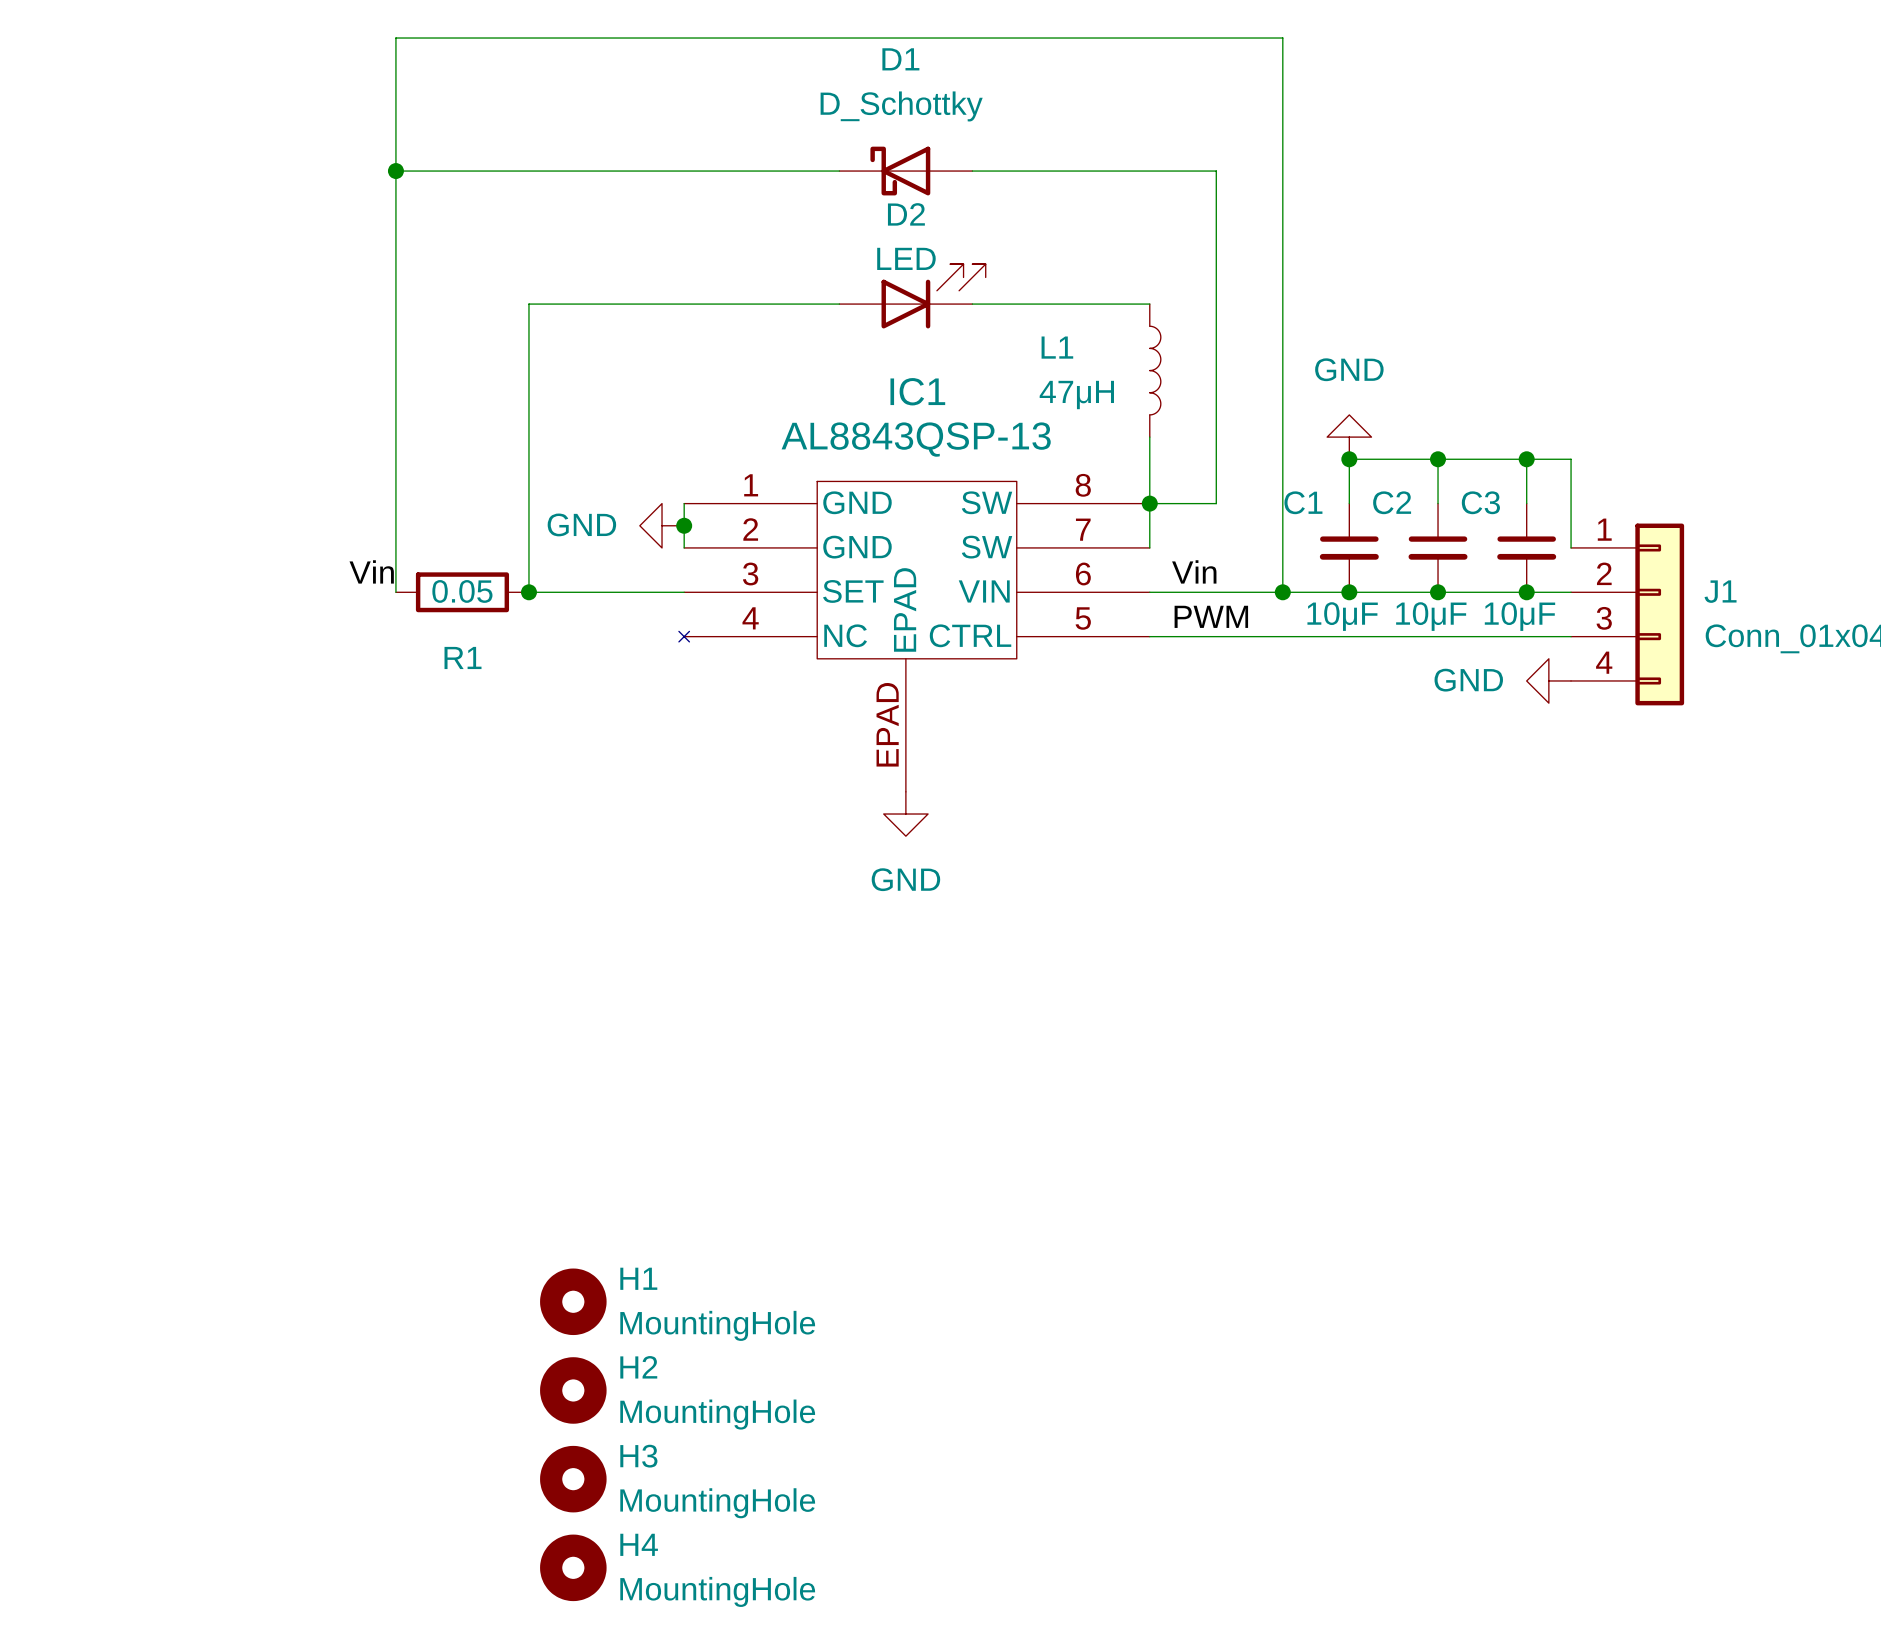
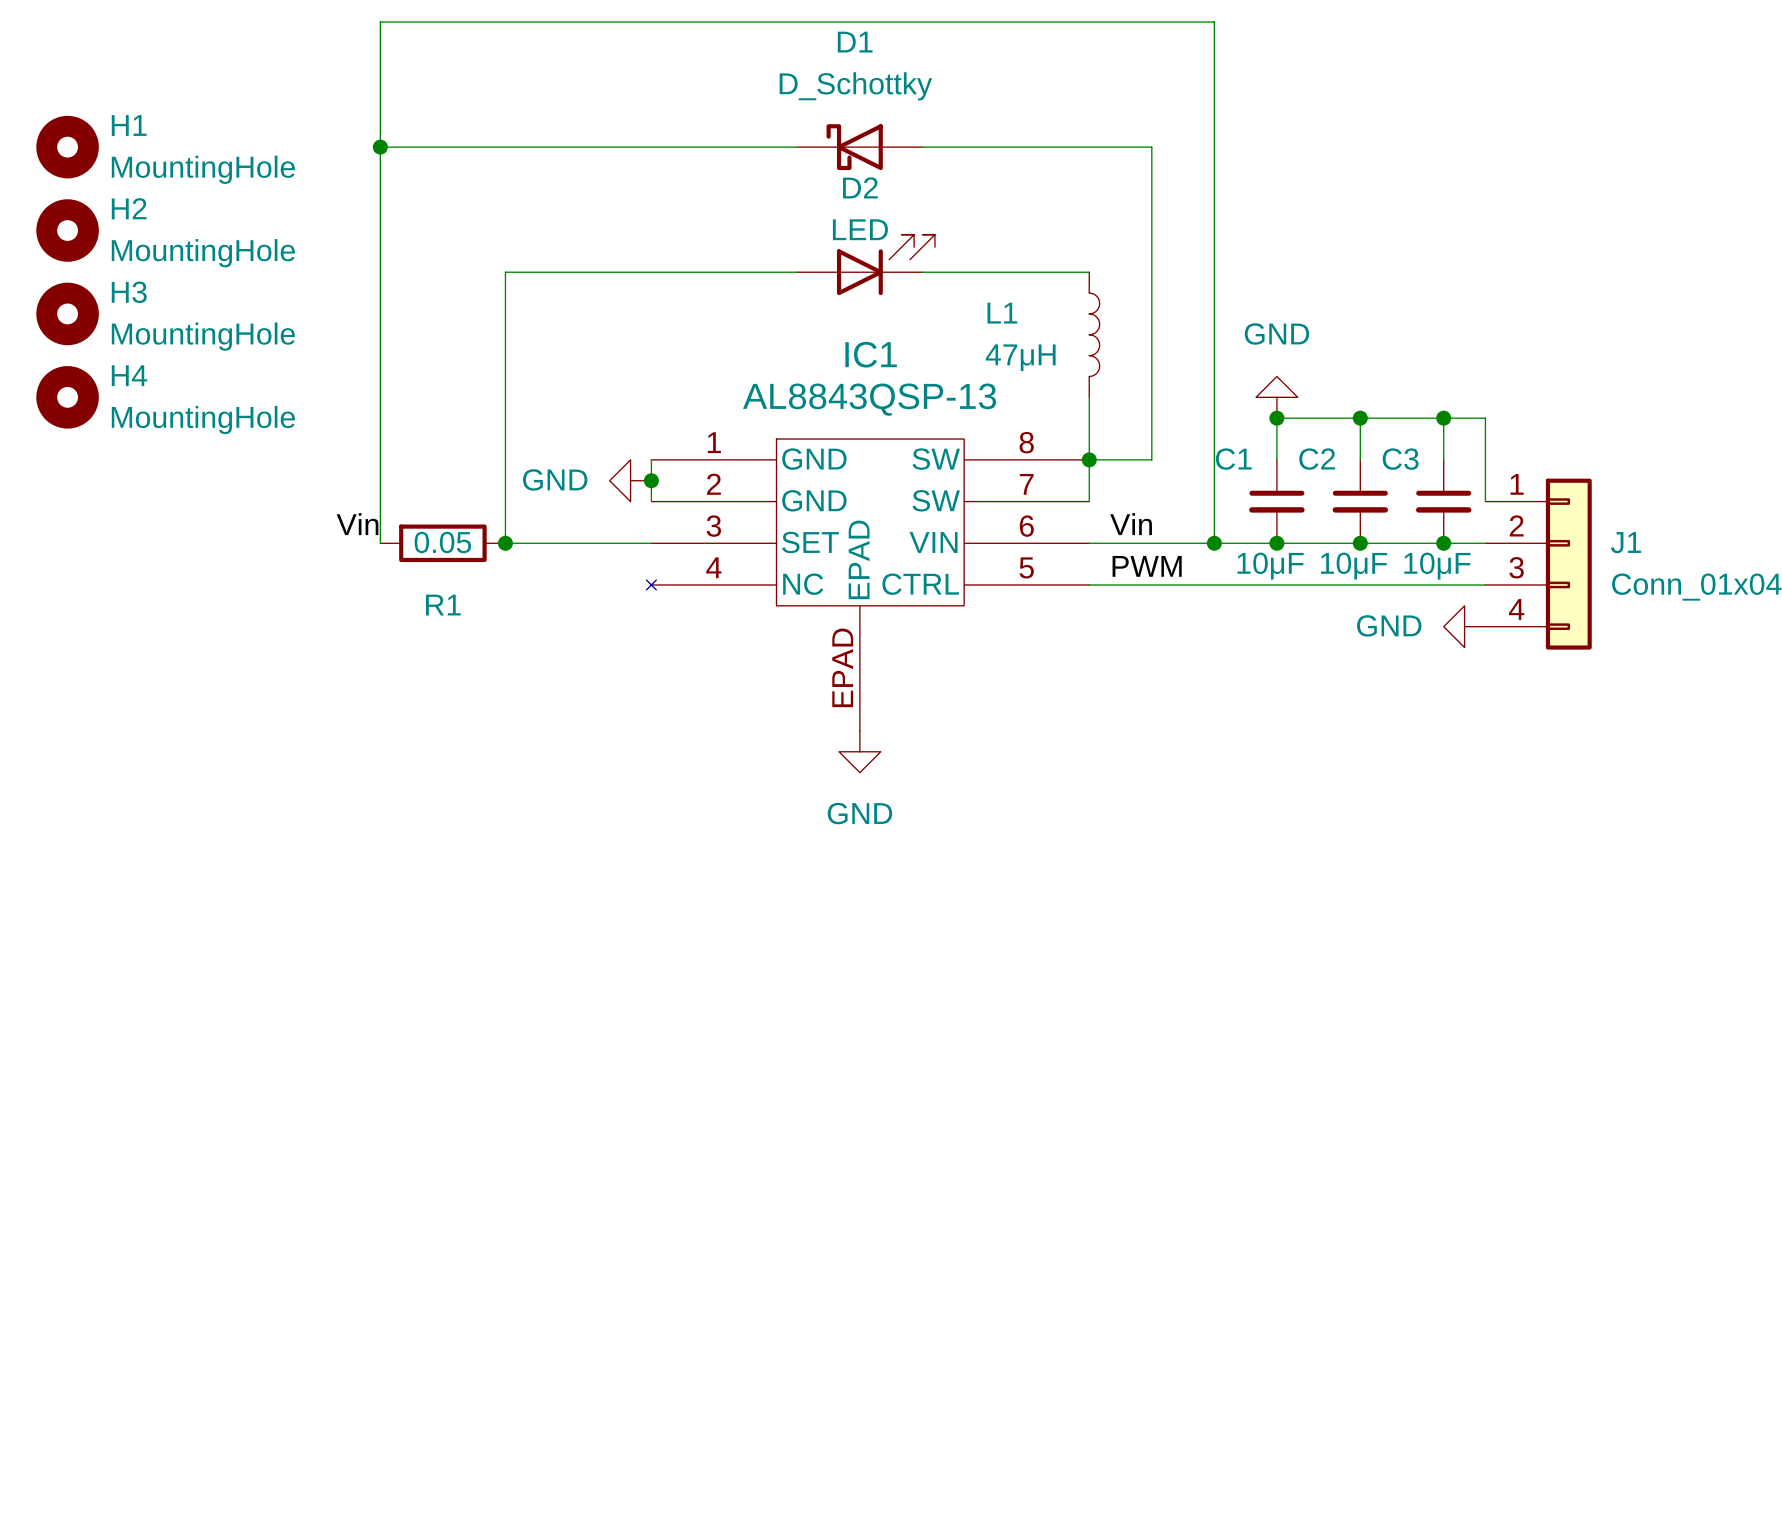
H1 position: (573, 1301) -> (67, 147)
H2 position: (573, 1390) -> (67, 230)
H3 position: (573, 1479) -> (67, 313)
H4 position: (573, 1567) -> (67, 397)

